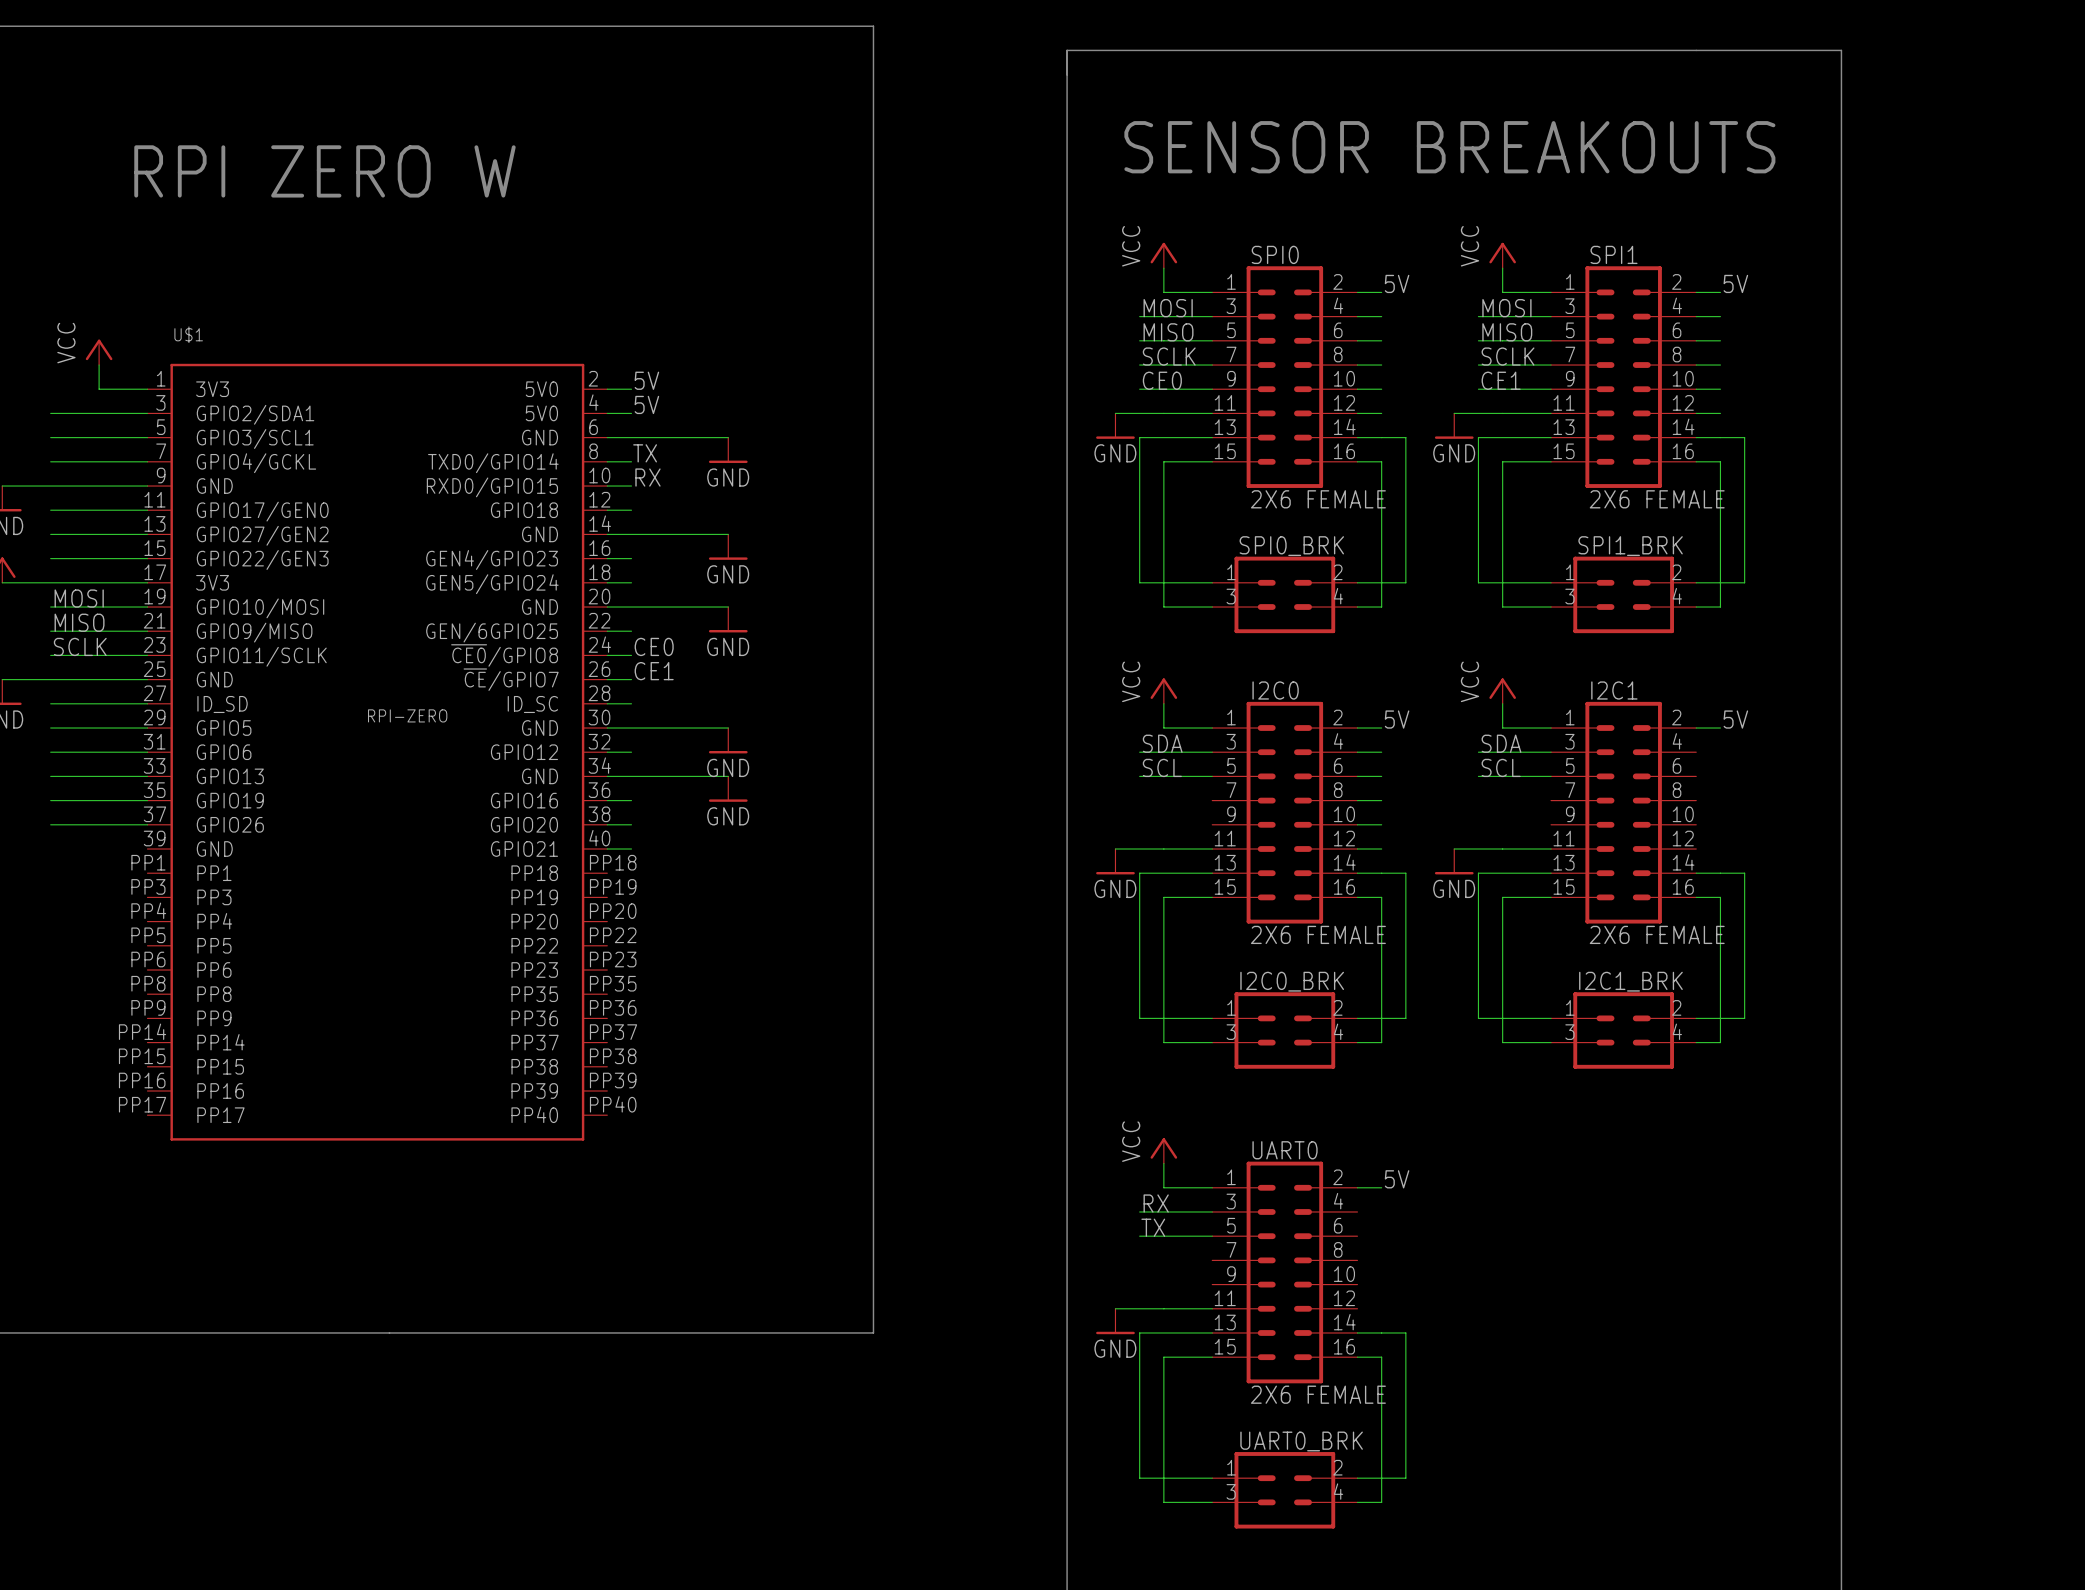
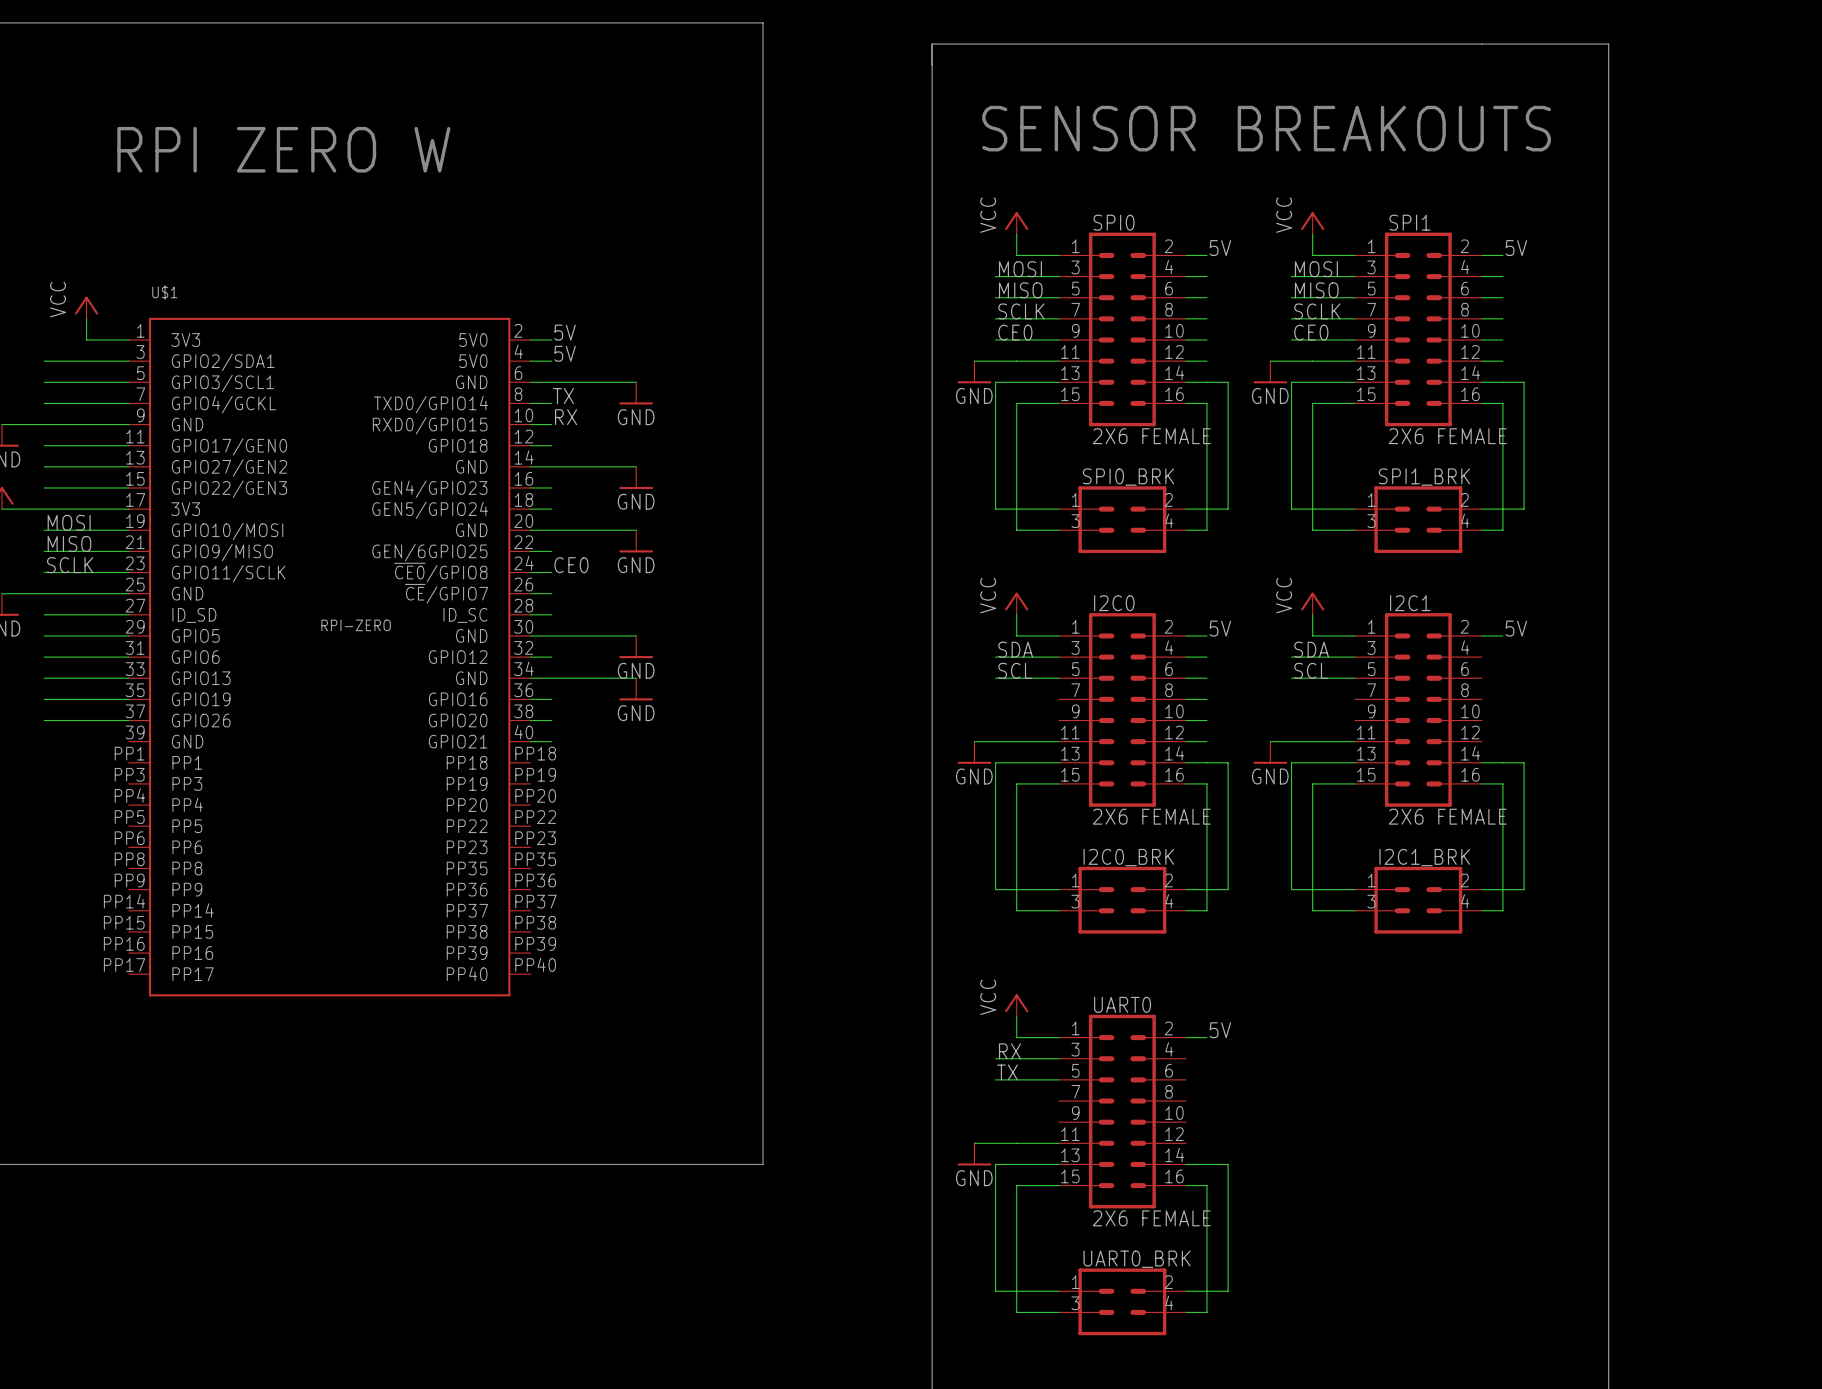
label: CE1 (1501, 380) -> CE0 (1311, 332)
label: CE1 (654, 671) -> none

